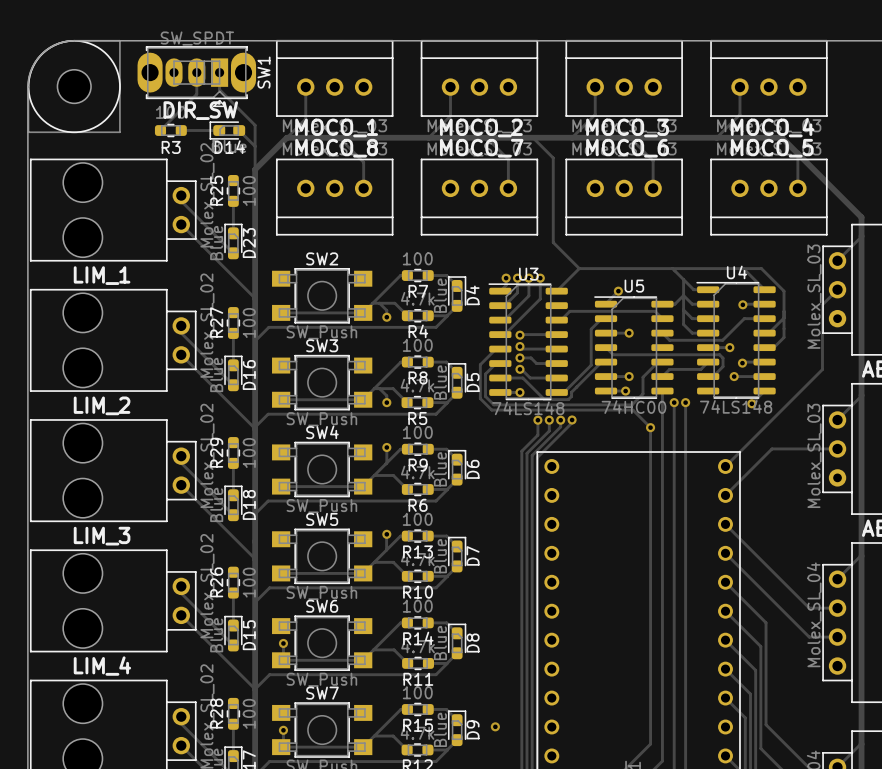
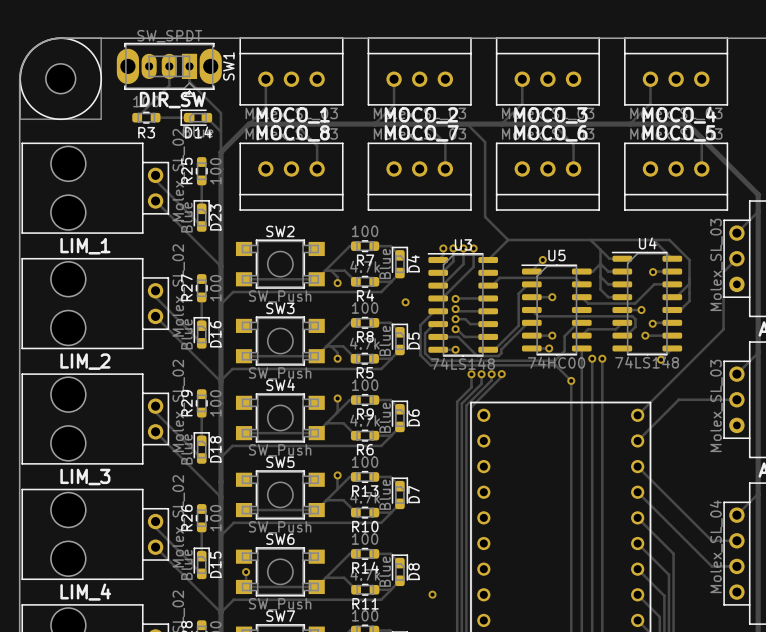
via: none -> (405, 302)
via: none -> (432, 594)

